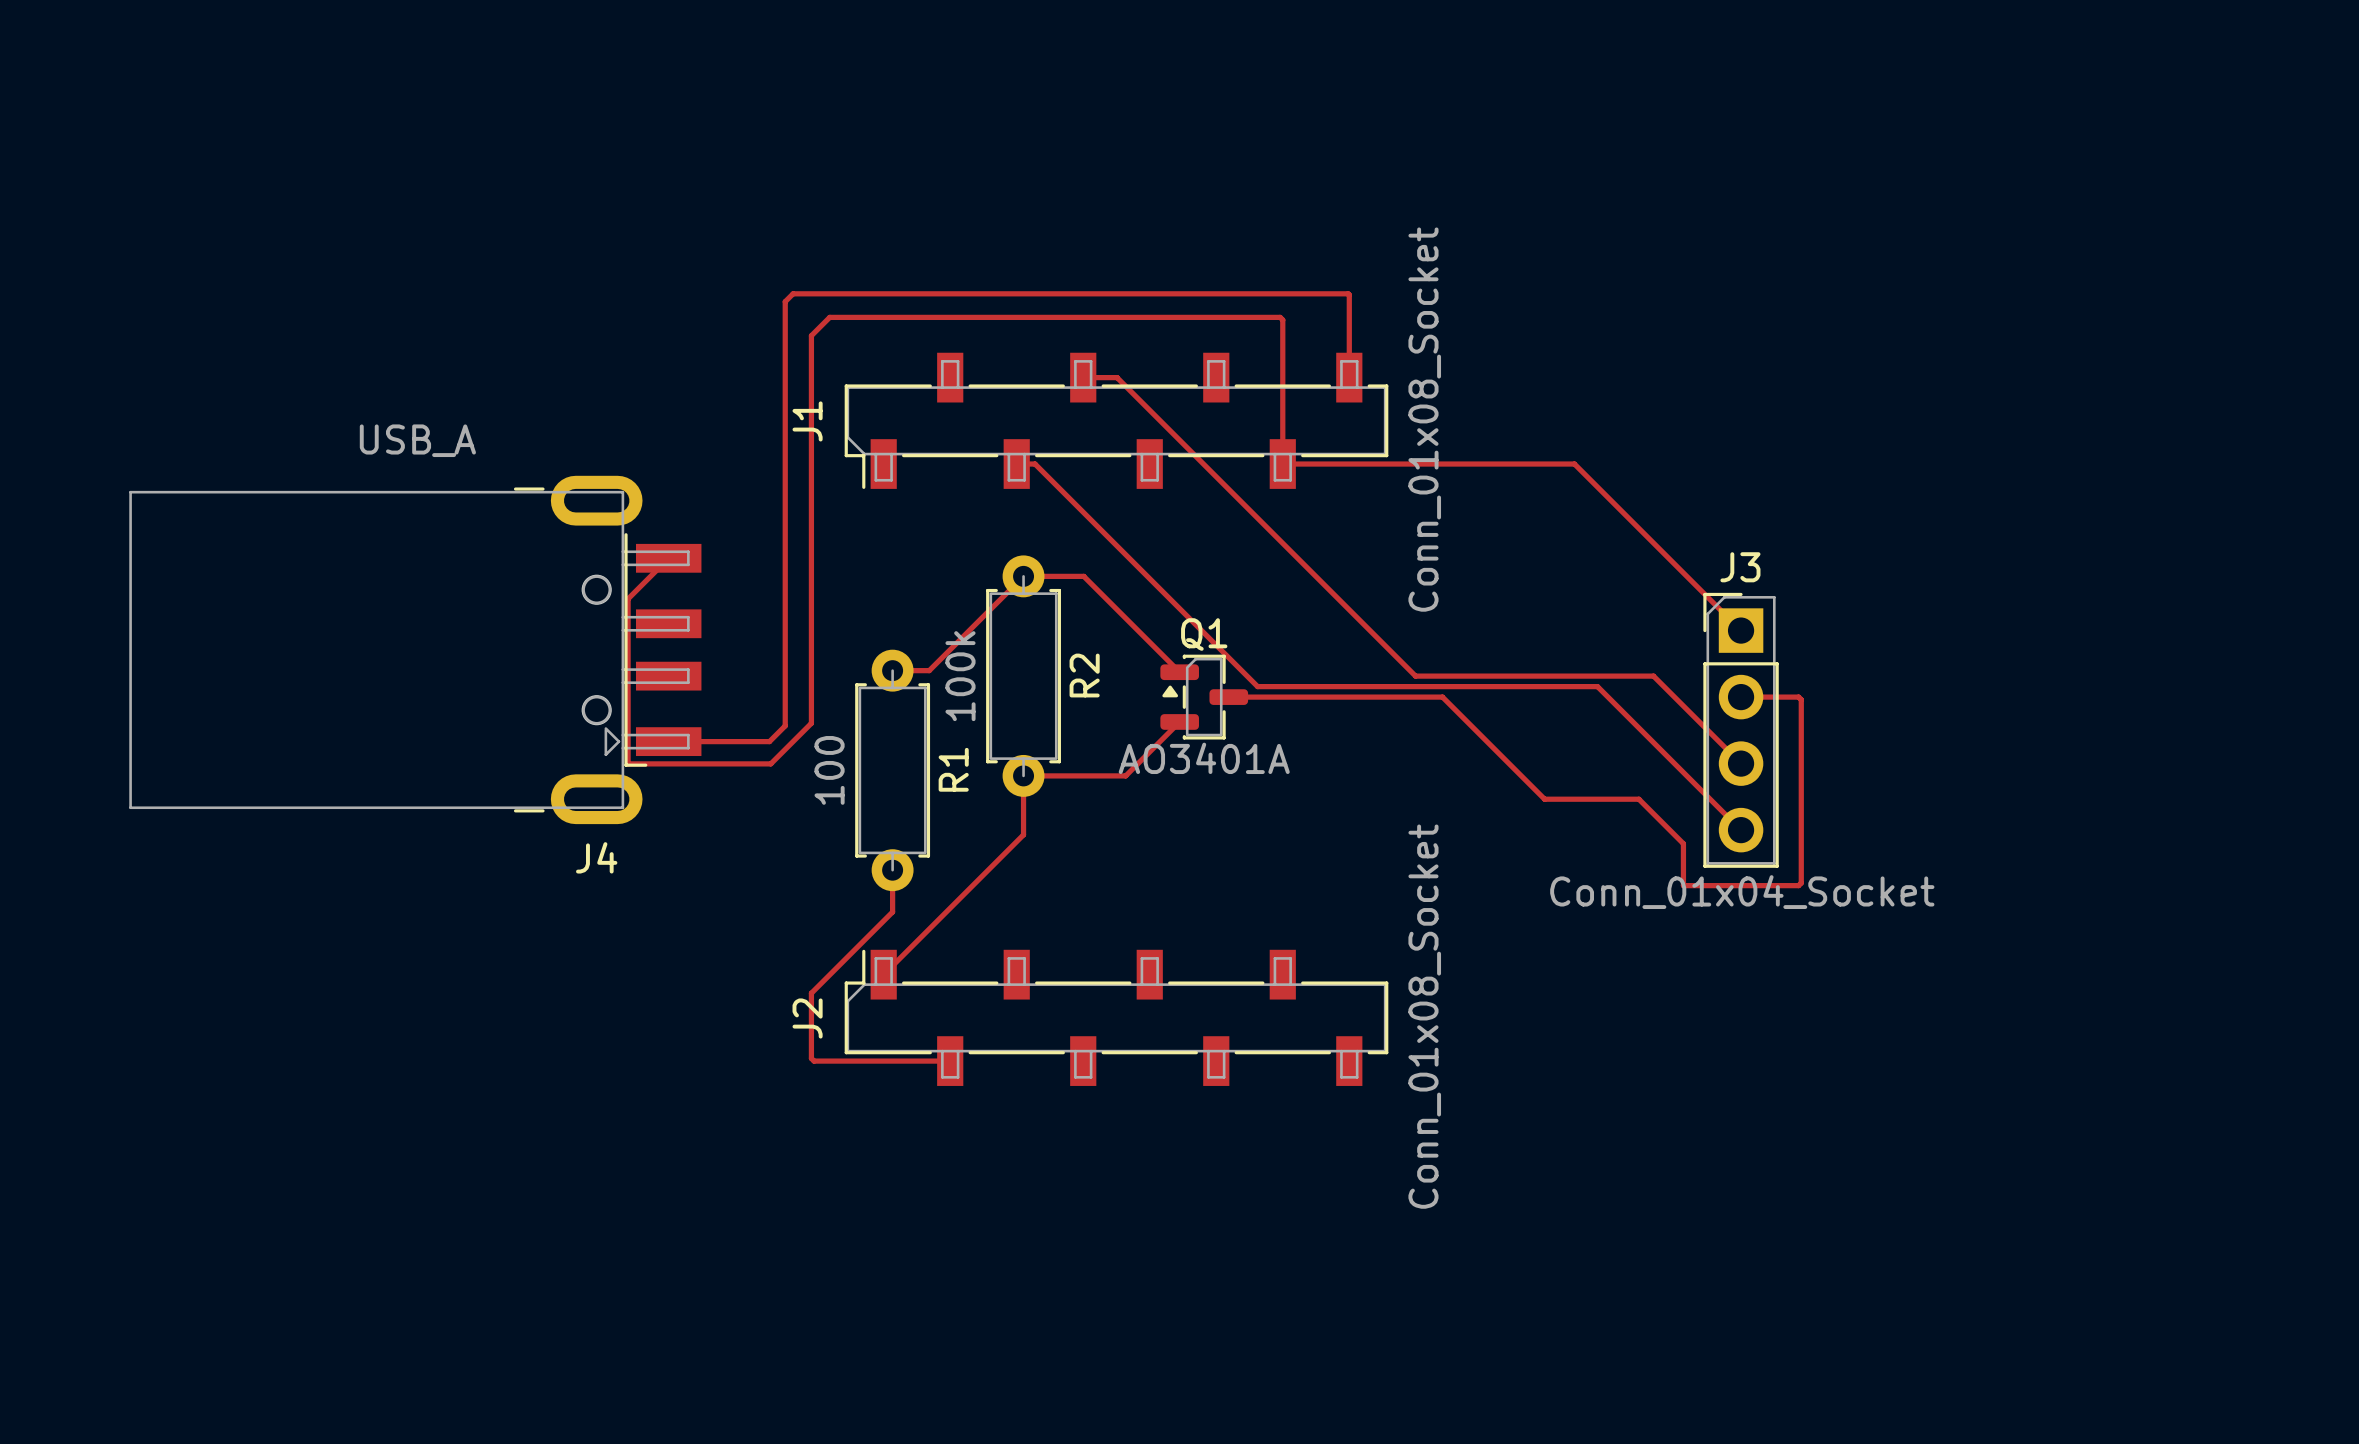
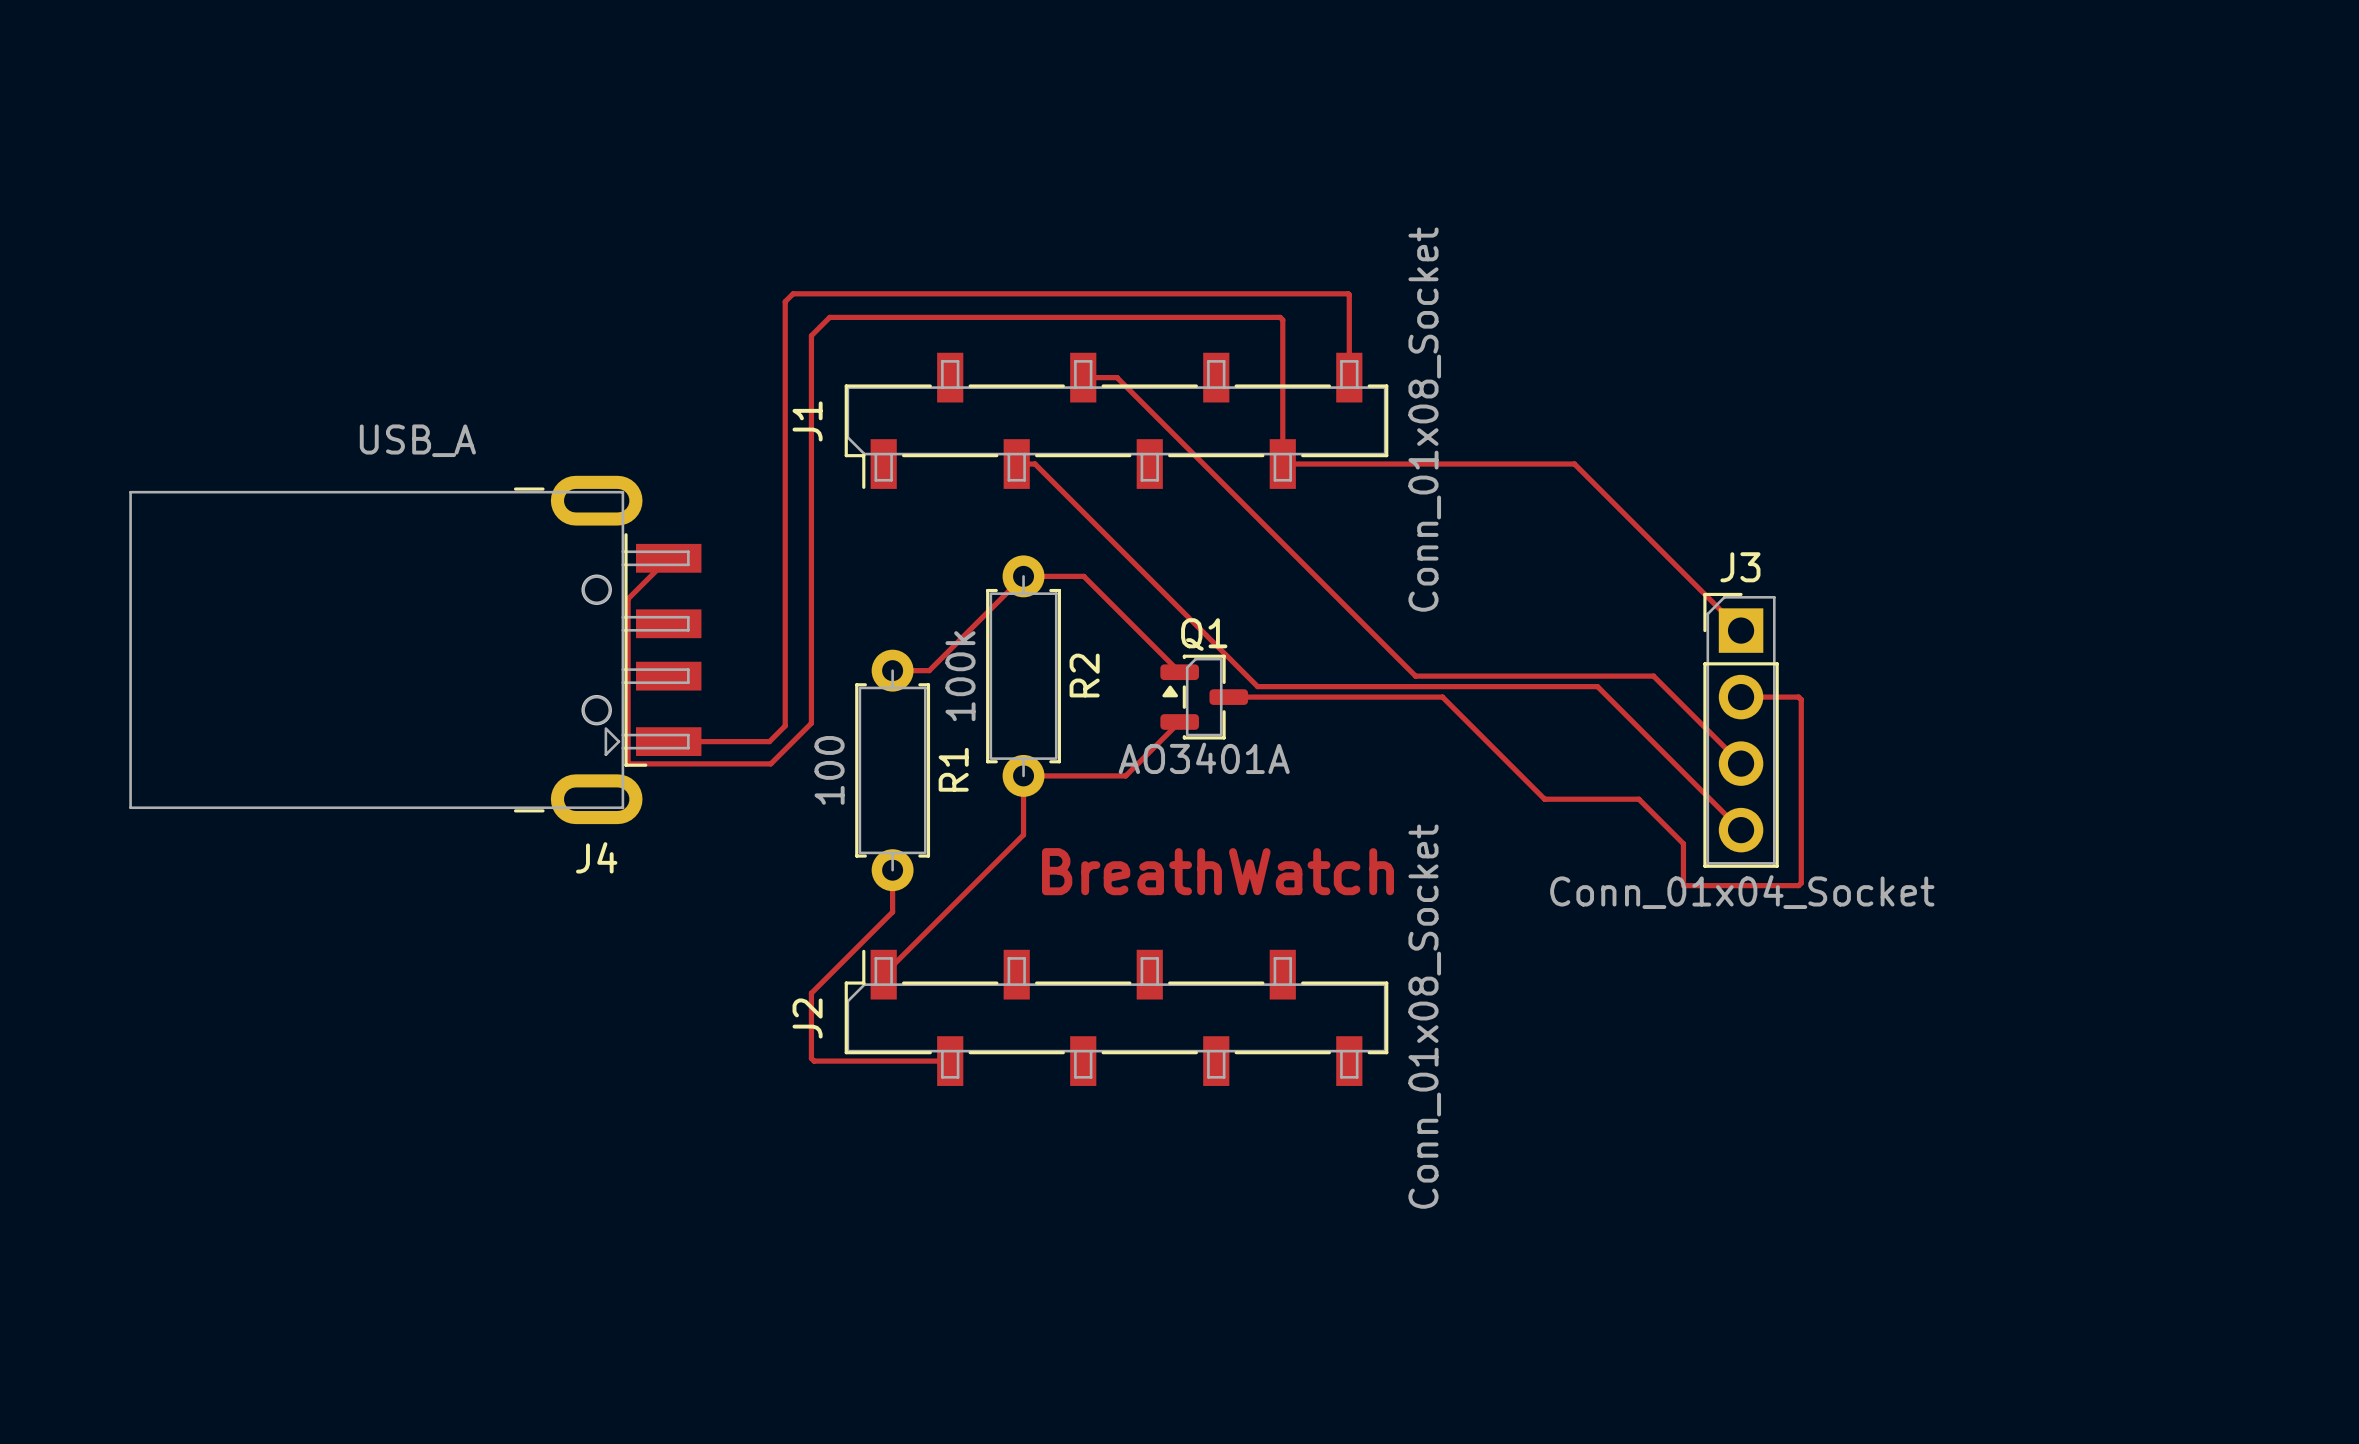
text: none -> BreathWatch (1218, 871)

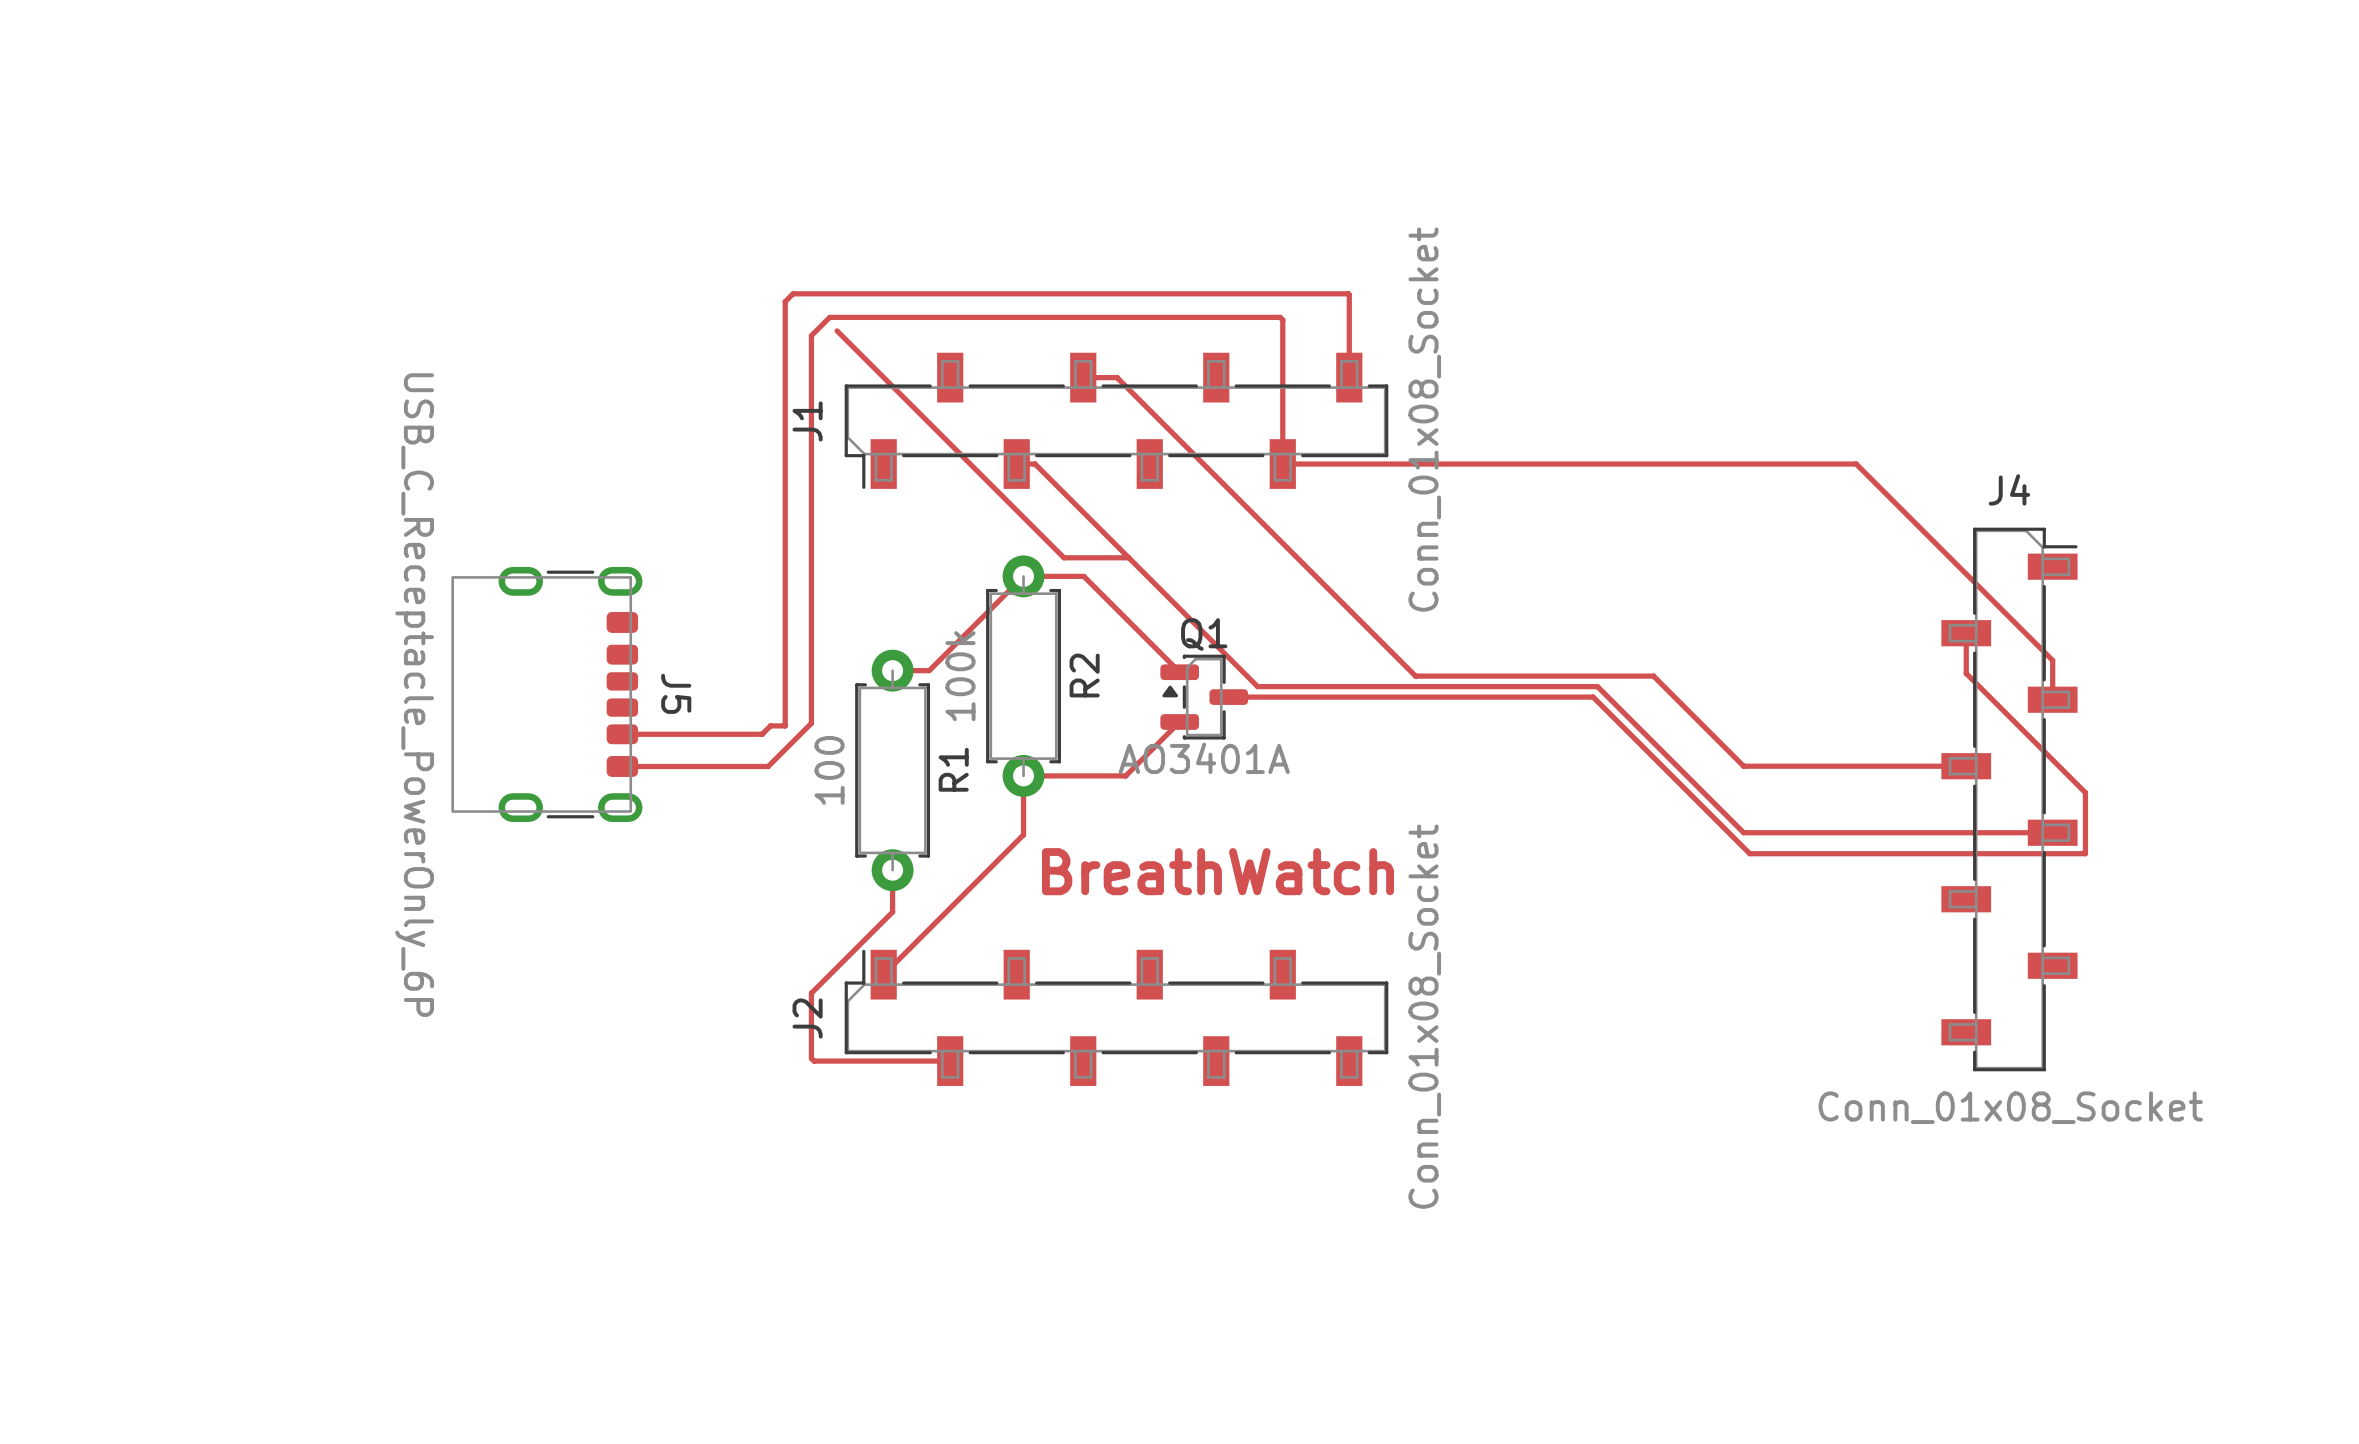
top track: none -> (837, 330) (1064, 557) (1128, 557)
J4 value: USB_A (417, 440) -> Conn_01x08_Socket (2010, 1107)
top track: (1574, 464) (1741, 630) -> (1574, 464) (1856, 464) (2052, 660) (2052, 699)
J4 footprint: [129, 475, 702, 825] -> [1941, 527, 2078, 1072]
top track: (668, 558) (628, 598) (628, 763) (770, 763) -> (622, 766) (768, 766) (770, 763)
J5: none -> USB_C_Receptacle_PowerOnly_6P (546, 694)
top track: (1442, 697) (1544, 799) (1638, 799) (1683, 843) (1683, 885) (1798, 885) (1801, 883) (1801, 699) (1798, 697) (1741, 697) -> (1442, 697) (1593, 697) (1749, 853) (2085, 853) (2085, 792) (1966, 673) (1966, 633)
top track: (785, 725) (769, 741) (668, 741) -> (785, 725) (770, 725) (762, 734) (622, 734)
J3: Conn_01x04_Socket (1741, 730) -> none
top track: none -> (1741, 763) (1743, 766) (1966, 766)
top track: none -> (1741, 830) (1743, 832) (2052, 832)
J4 name position: J4 (596, 857) -> J4 (2009, 489)

